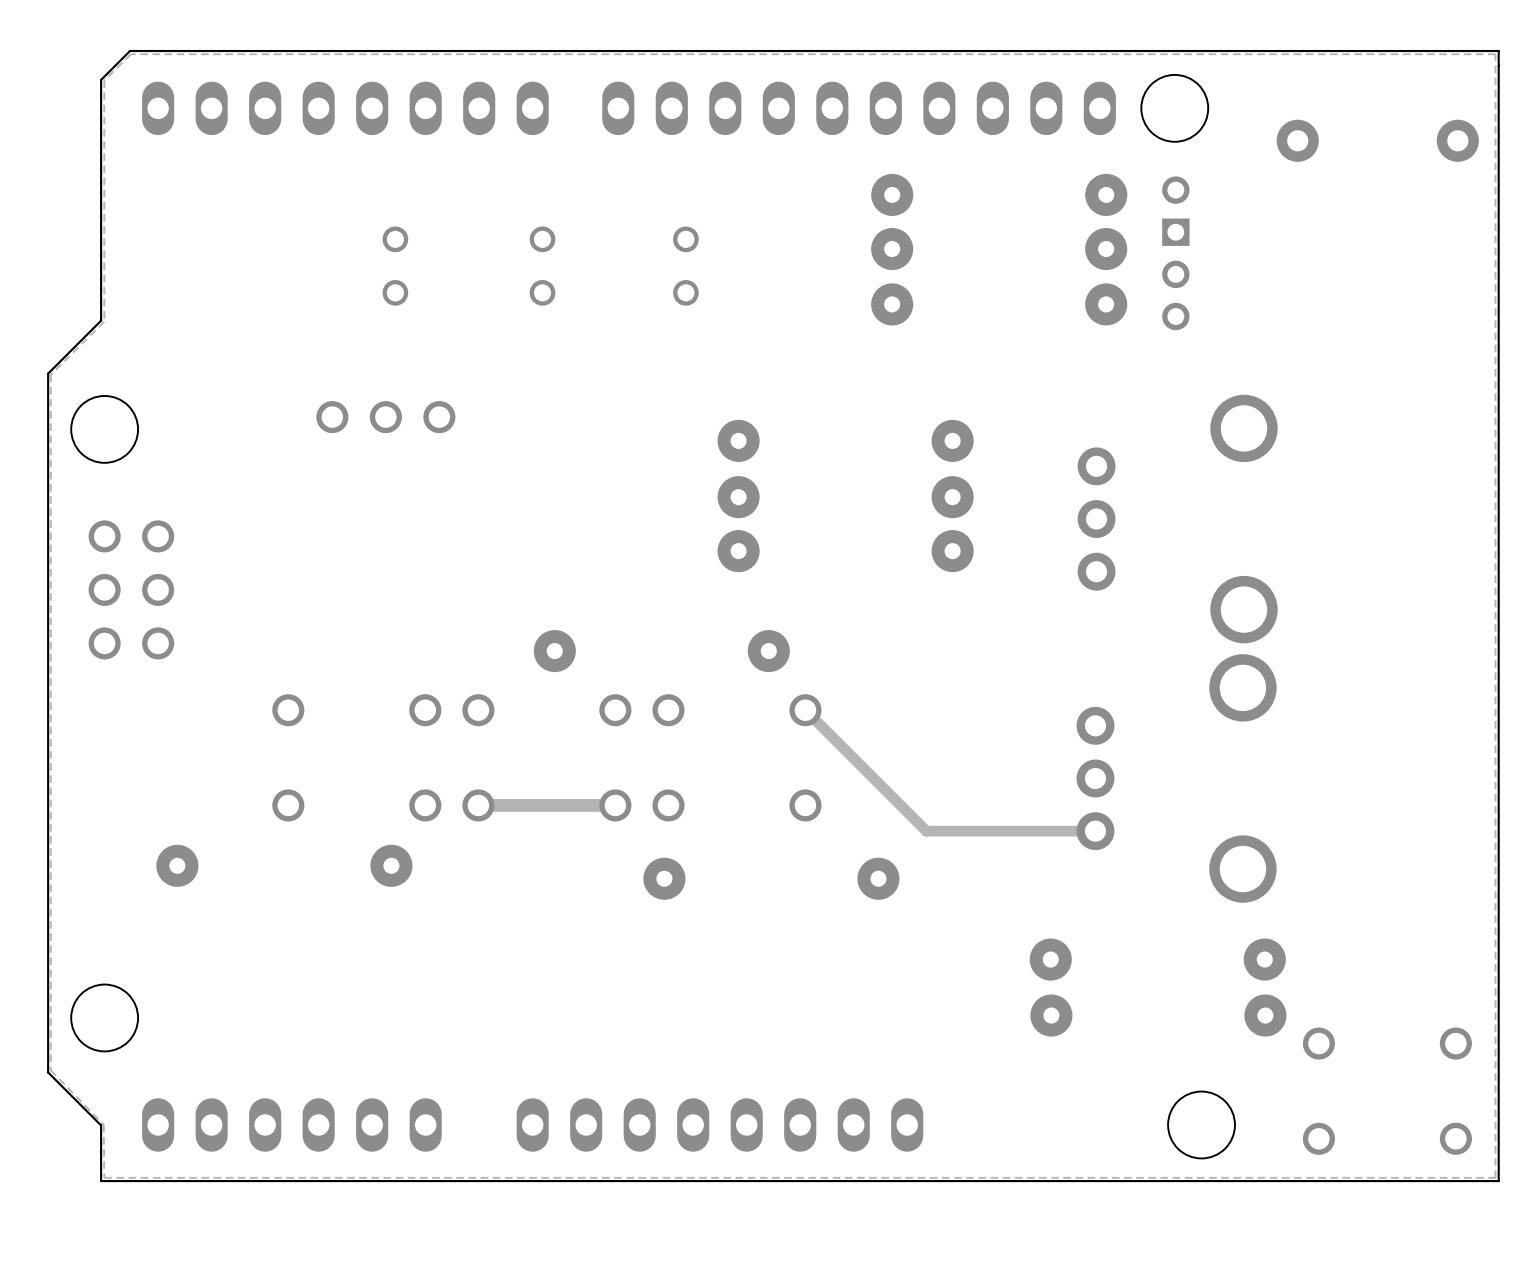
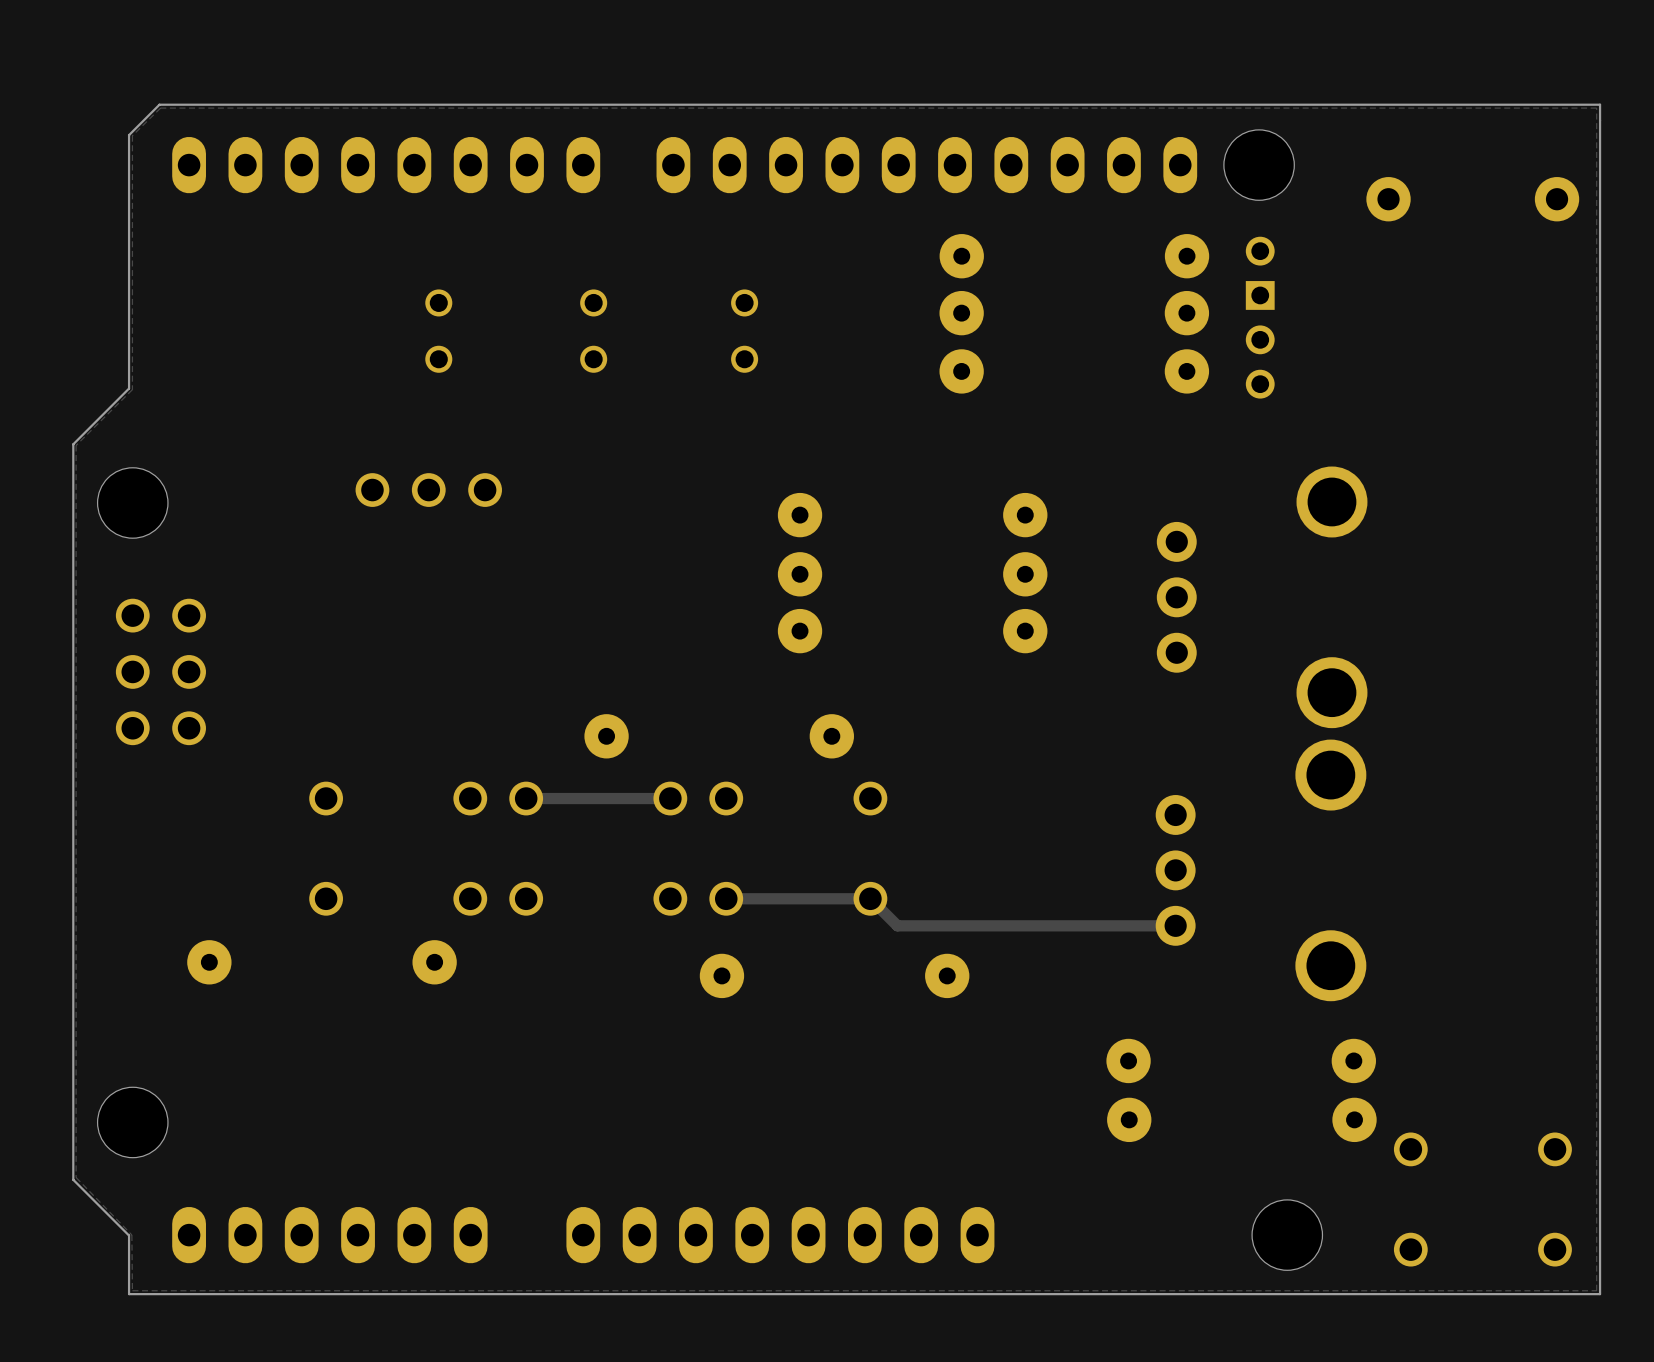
track: (805, 710) (926, 831) -> (726, 898) (870, 898) (897, 925) (997, 925)
track: (615, 805) (478, 805) -> (670, 798) (526, 798)

